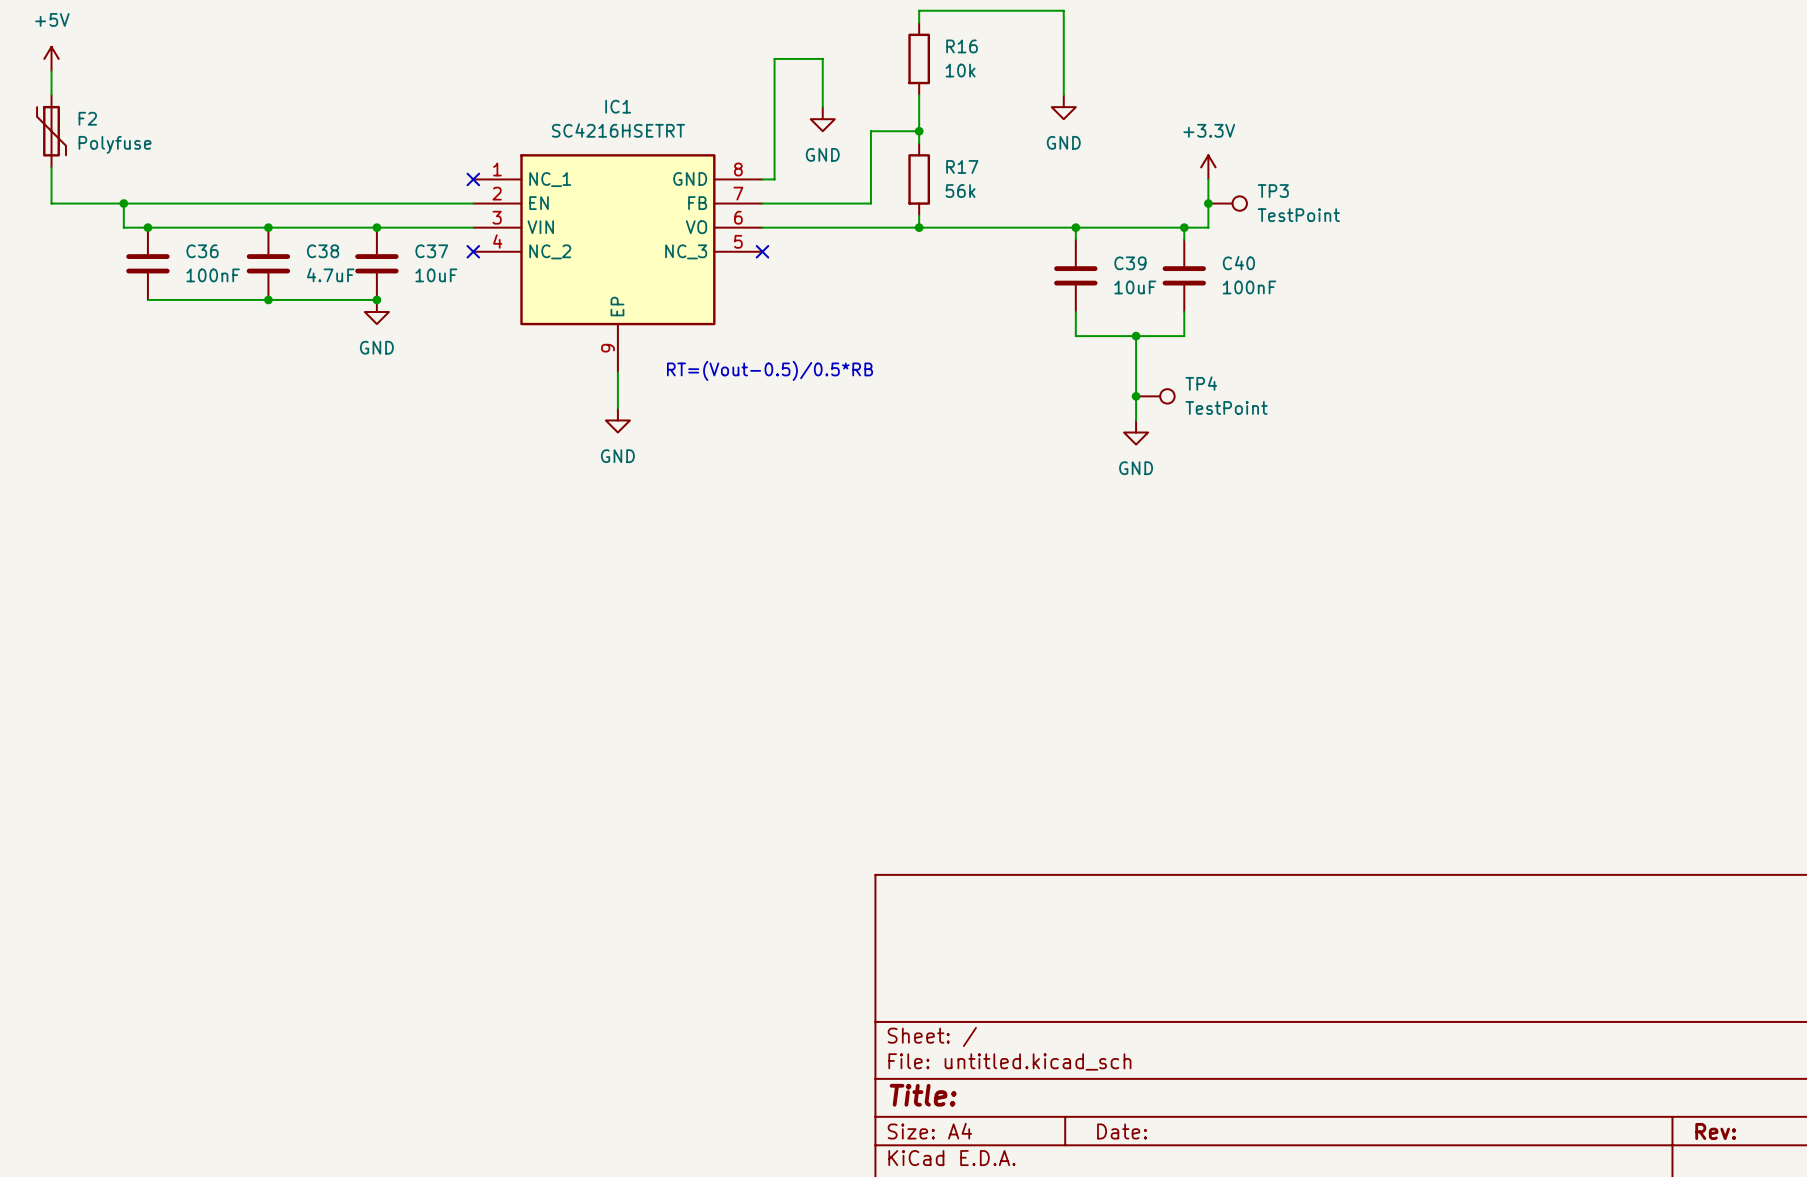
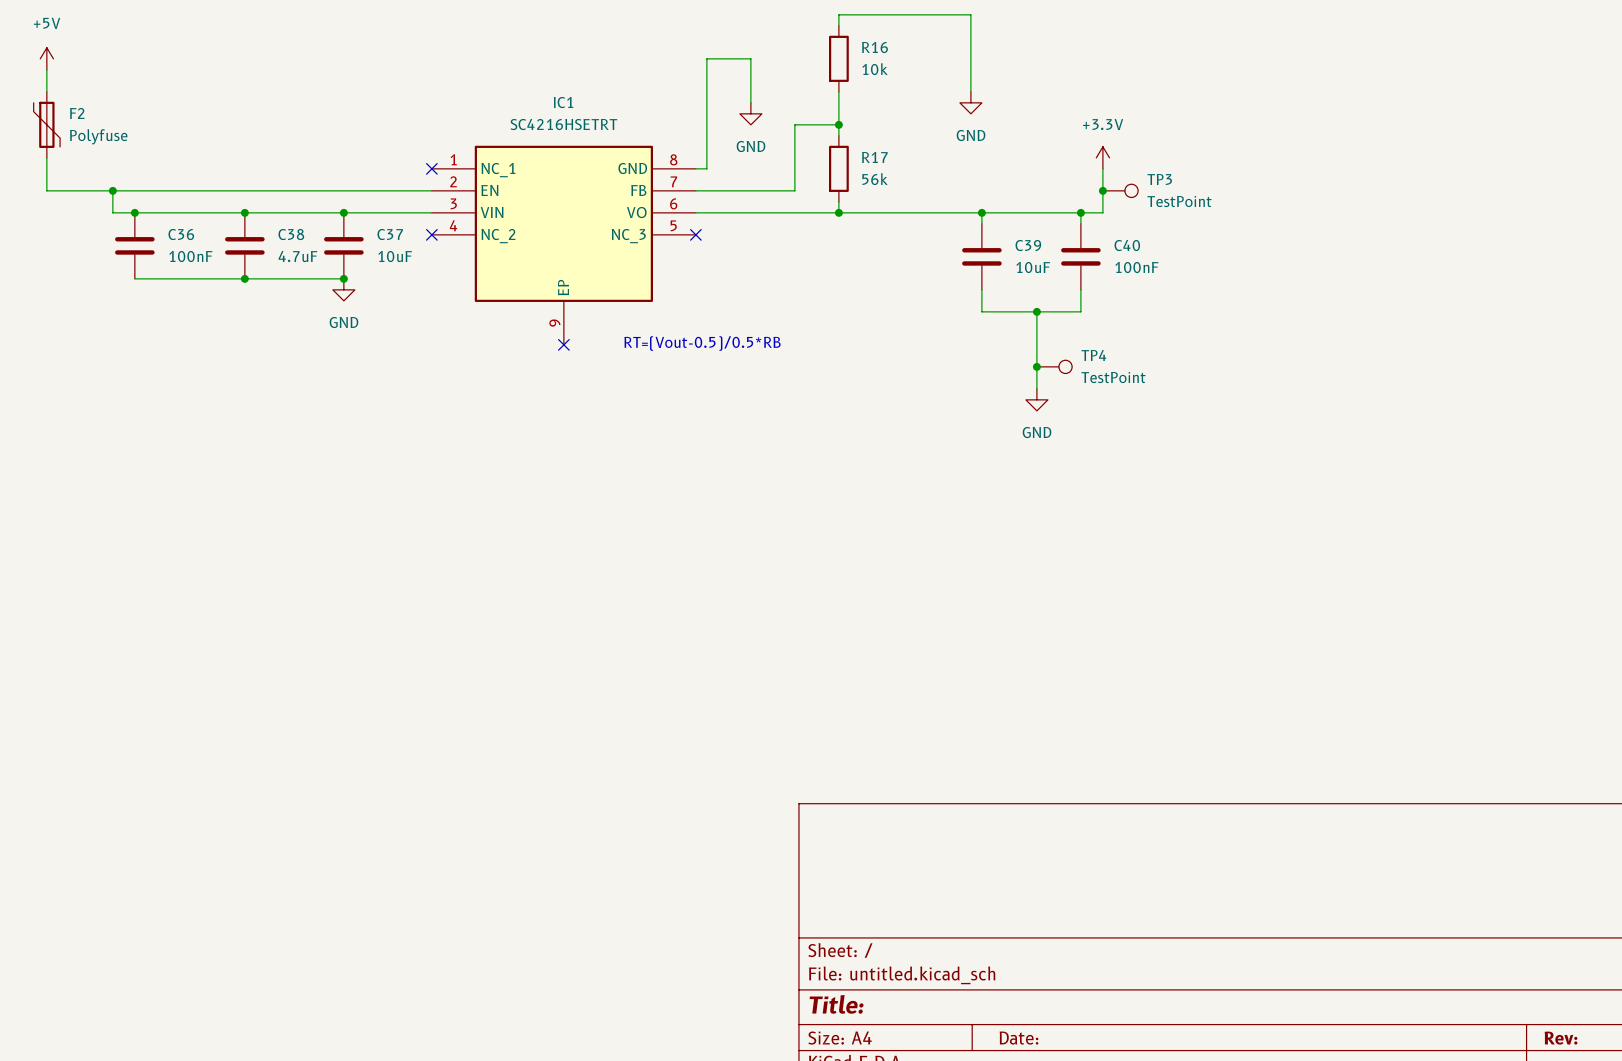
wire: (617, 372) (617, 408) -> none
no-connect mark: none -> (563, 344)
power symbol: GND (617, 420) -> none

